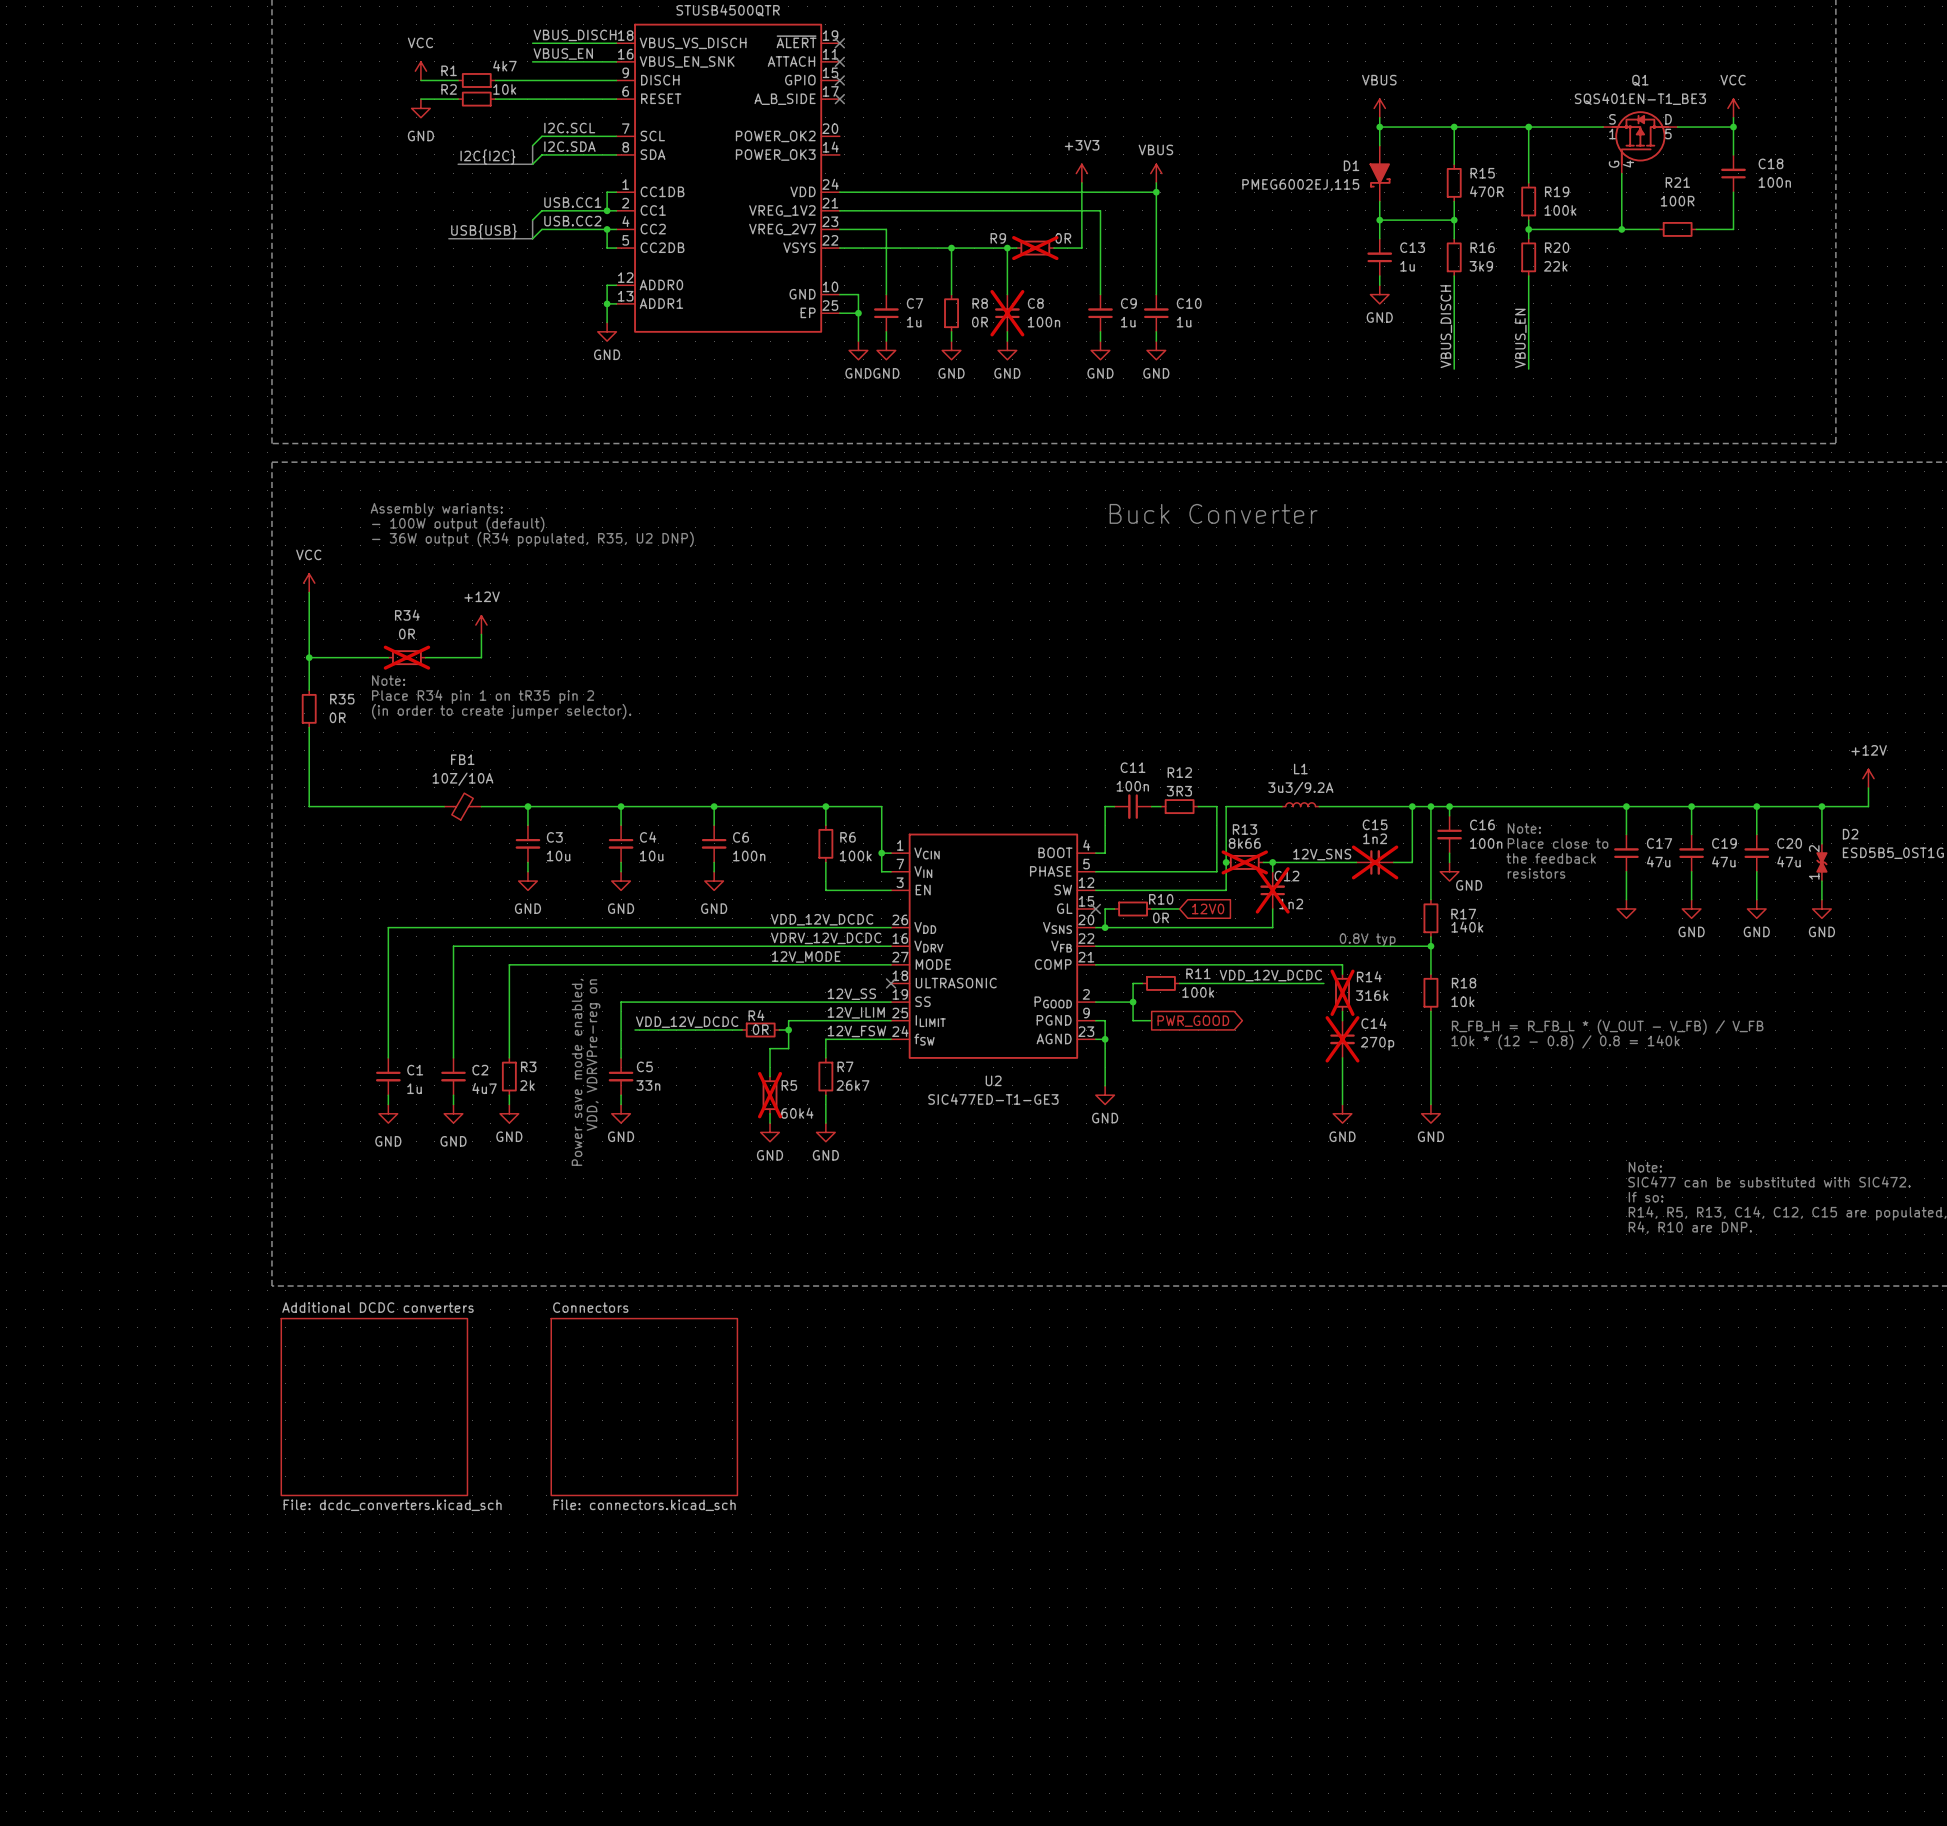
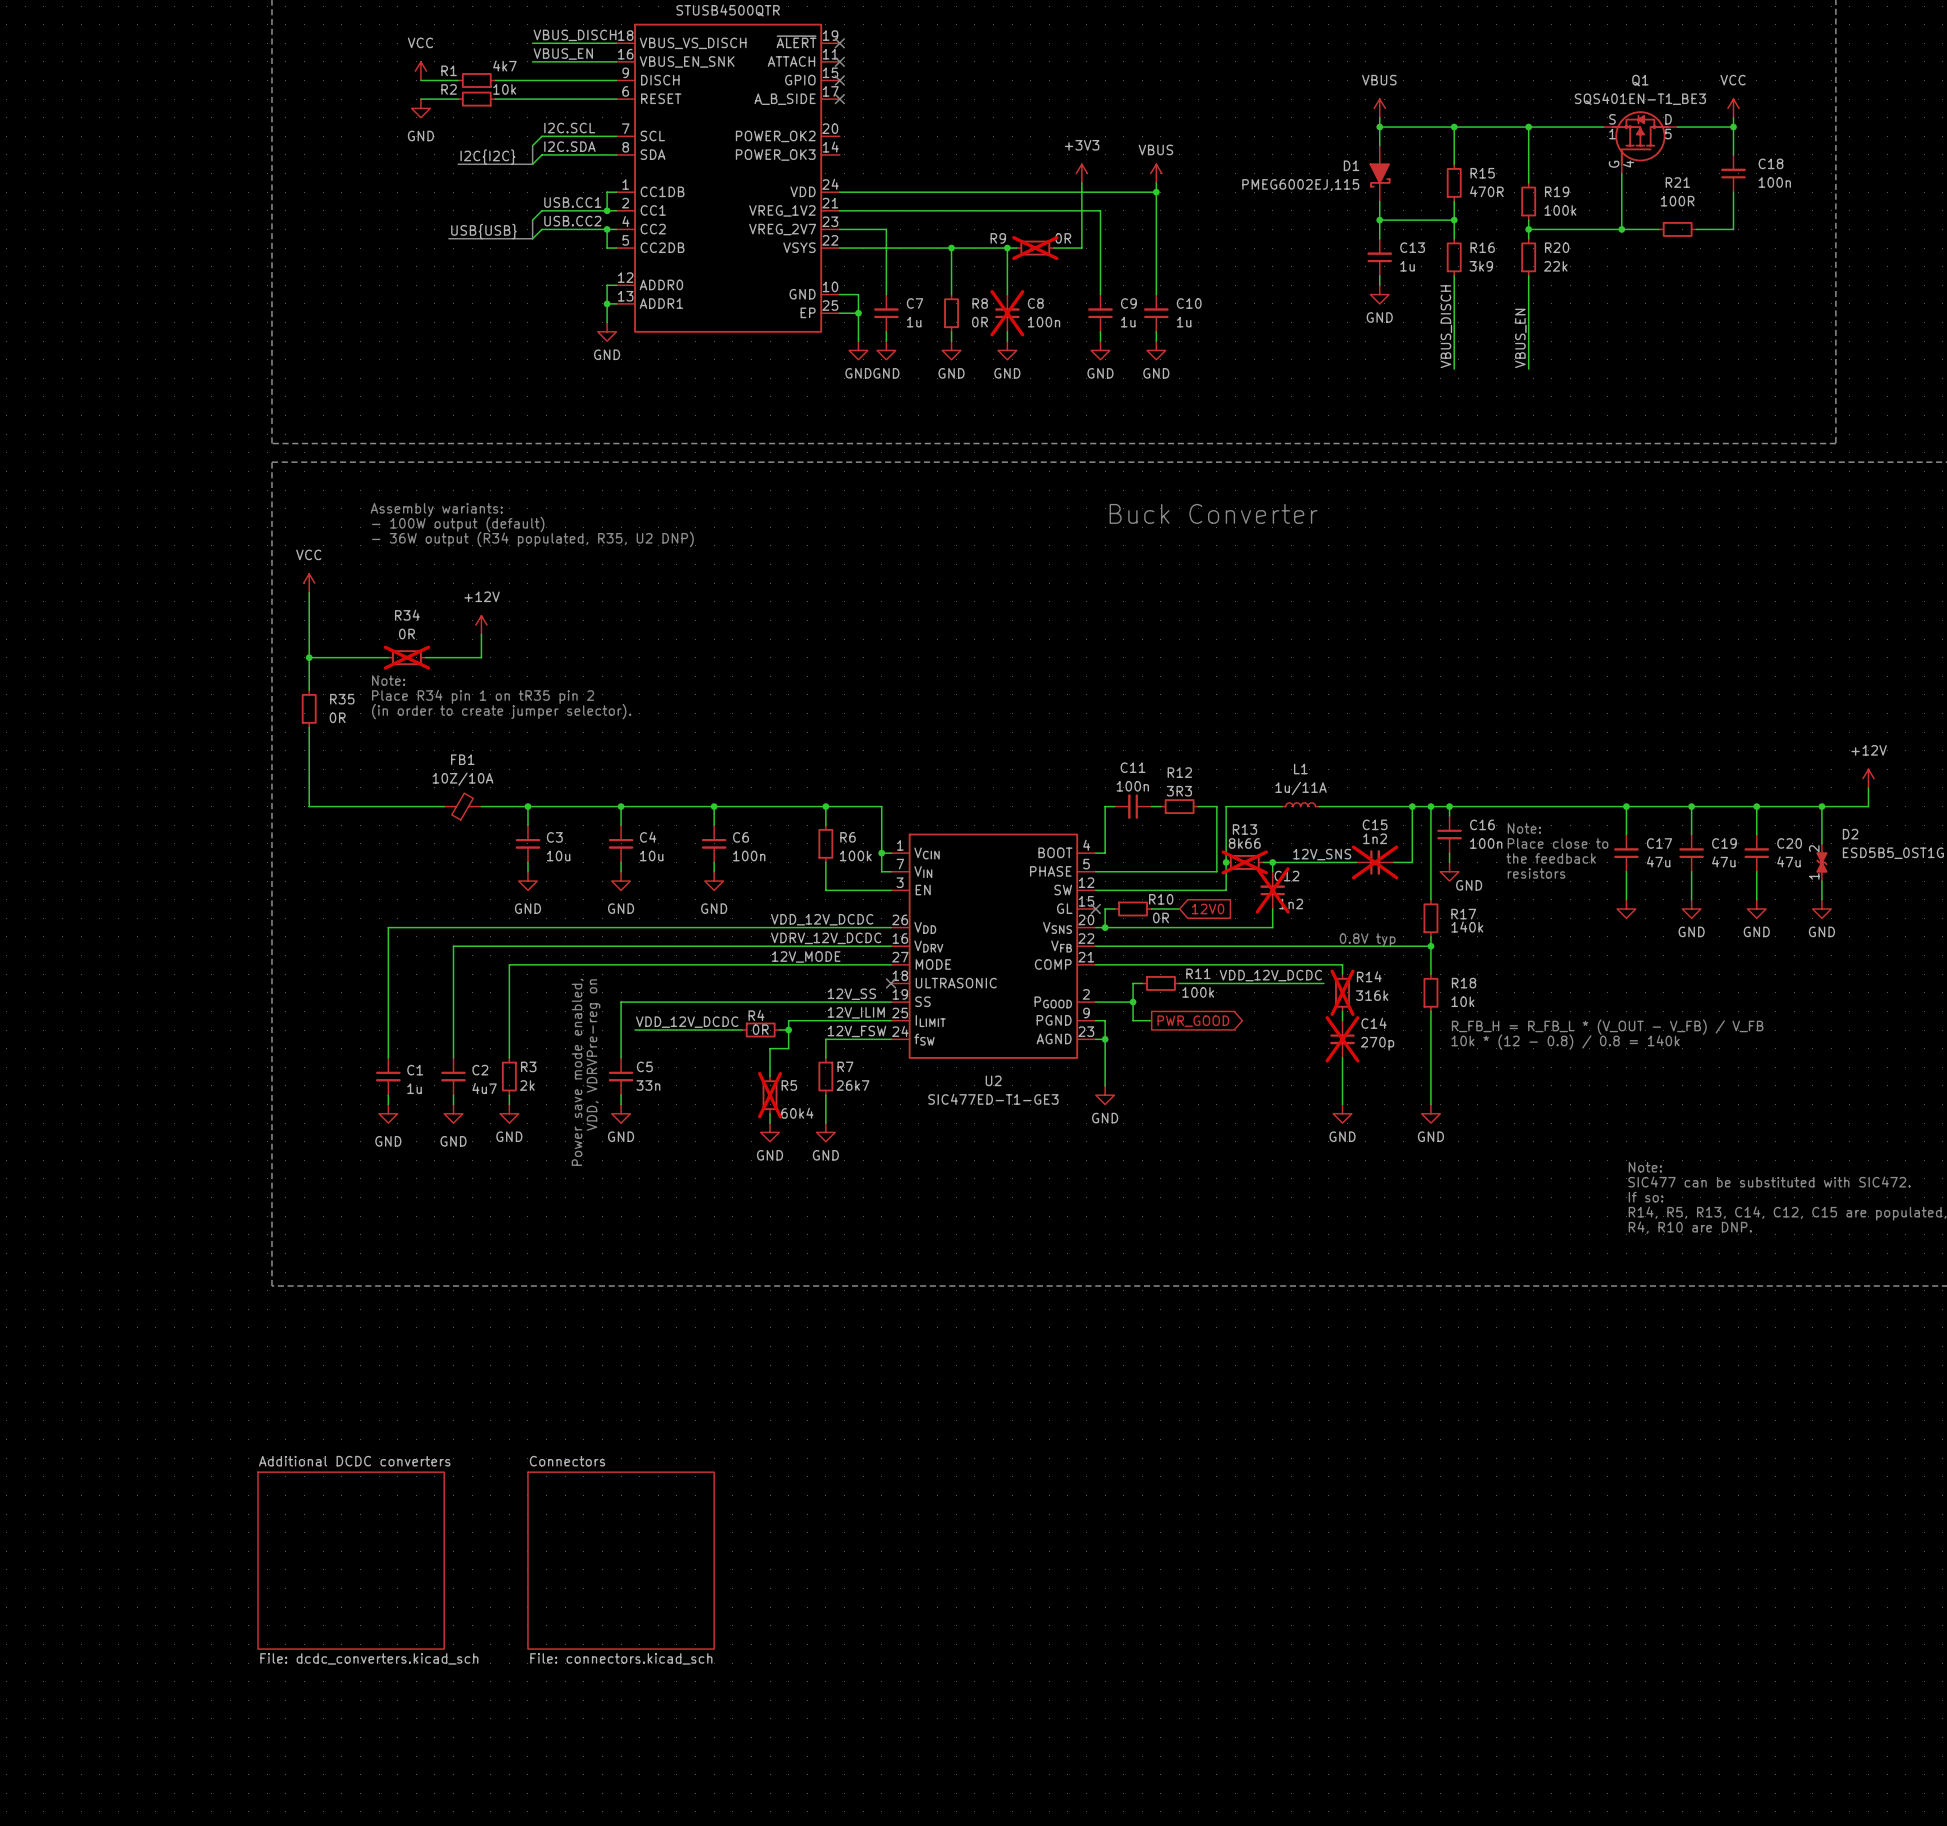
L1 text: 3u3/9.2A (1300, 788) -> 1u/11A (1301, 788)
sheet Additional DCDC converters position: (374, 1407) -> (351, 1560)
sheet Connectors position: (644, 1407) -> (621, 1560)

